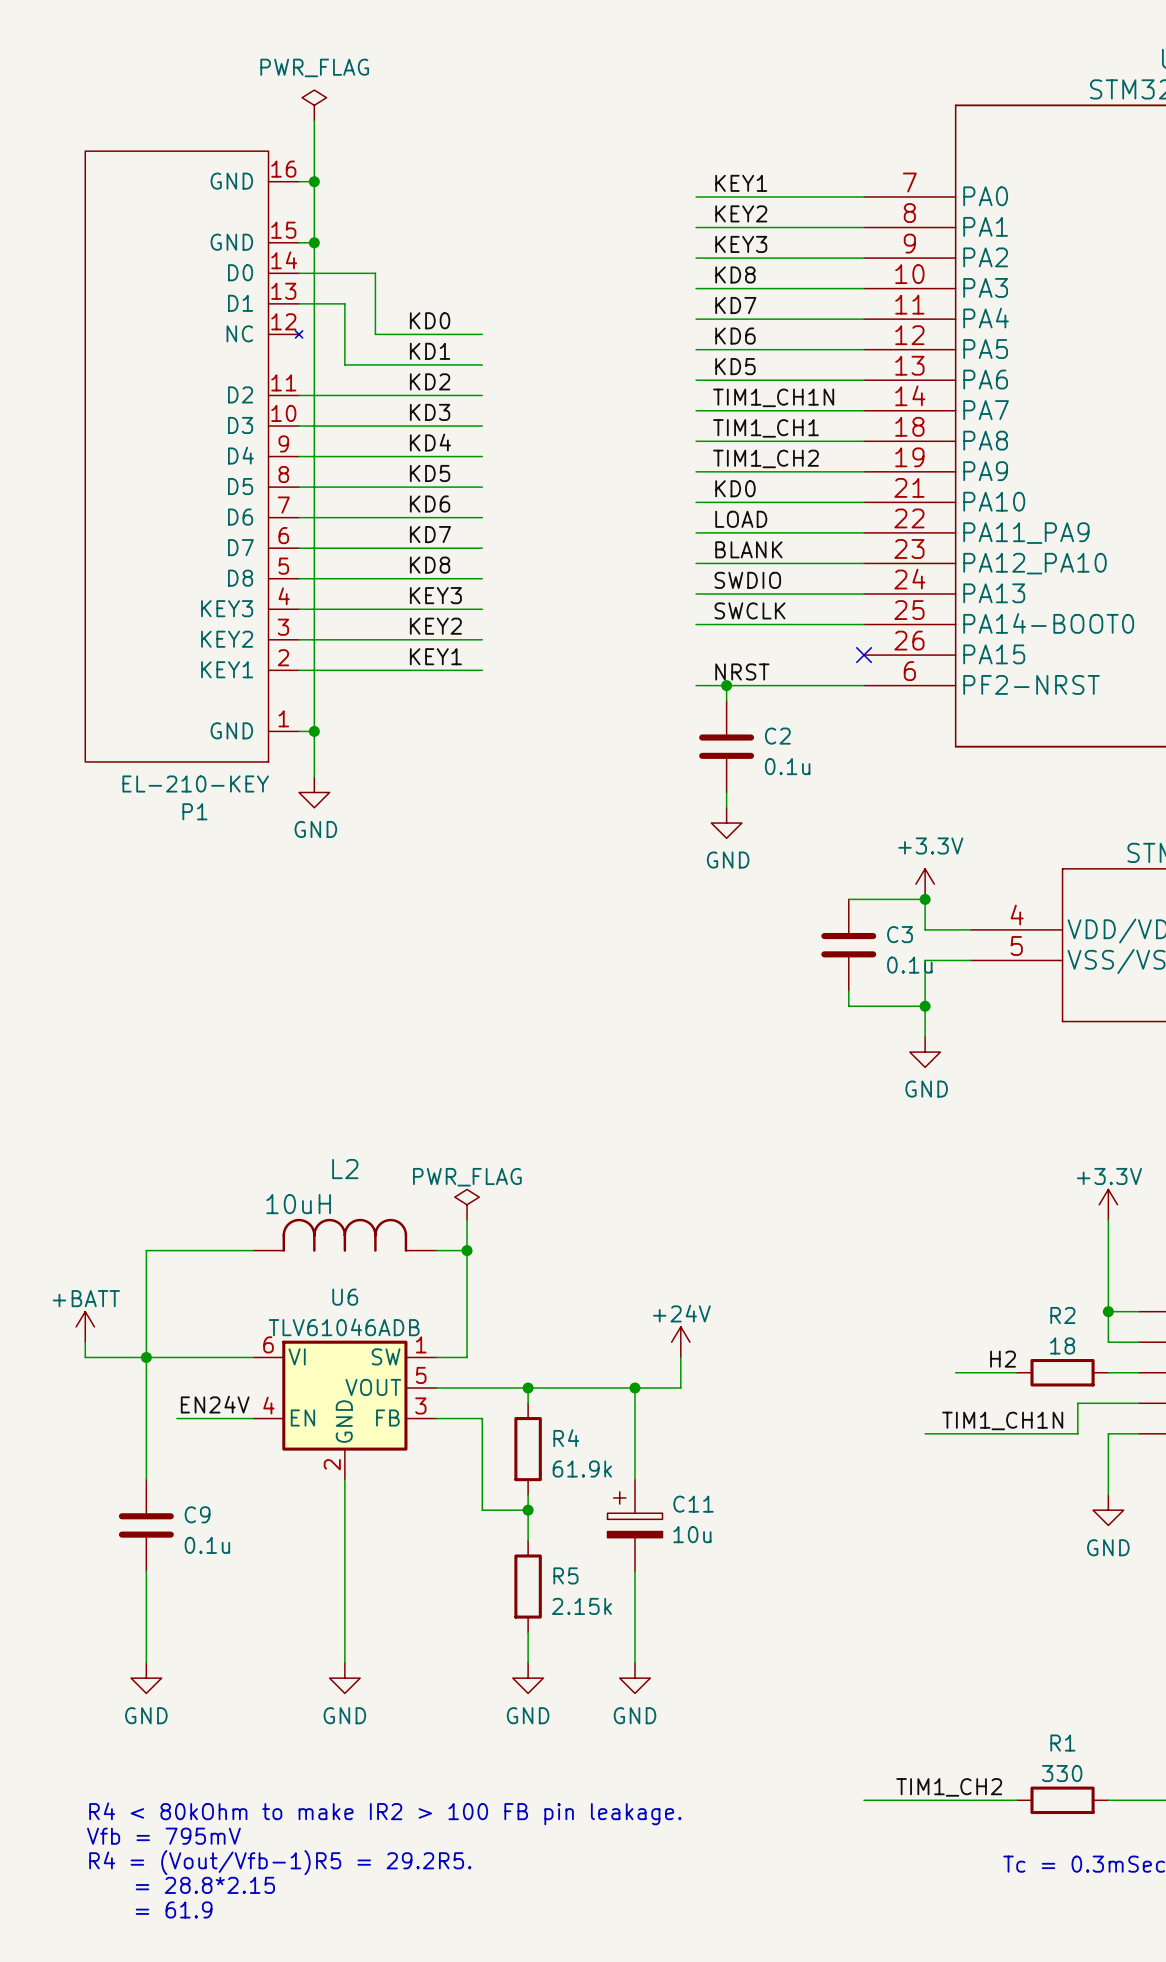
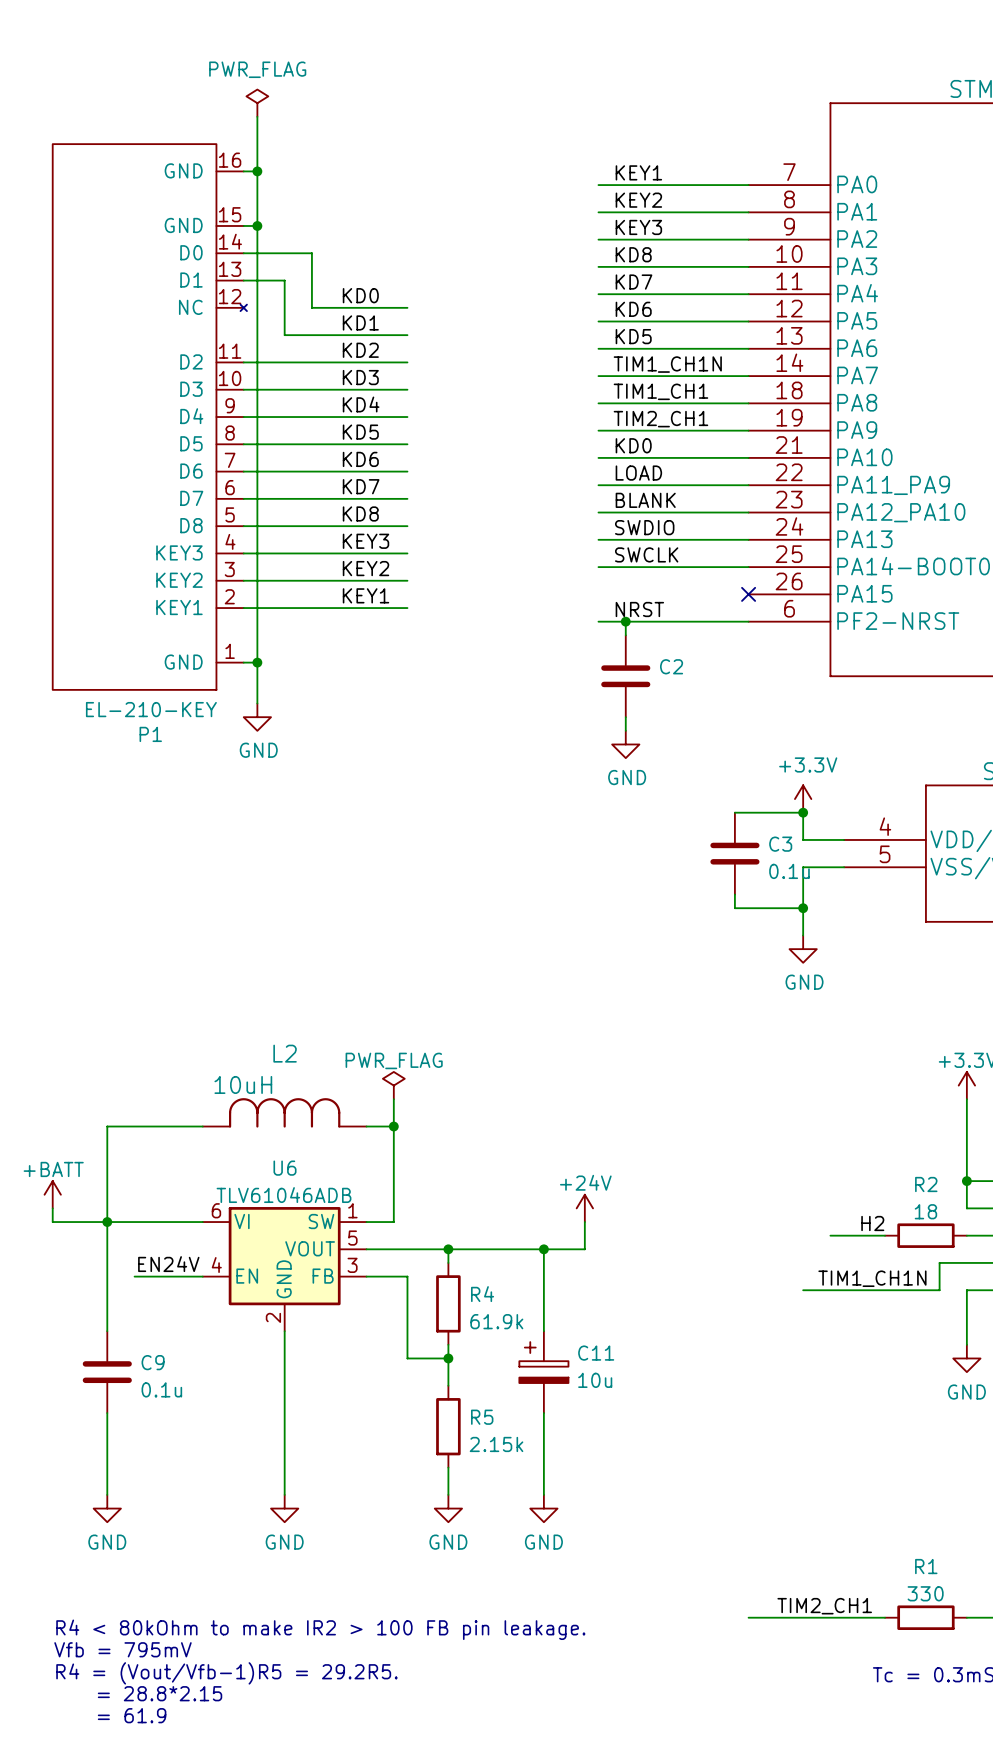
label: TIM1_CH2 (765, 458) -> TIM2_CH1 (660, 419)
C2 value: 0.1u (787, 766) -> none
label: TIM1_CH2 (949, 1787) -> TIM2_CH1 (824, 1606)

